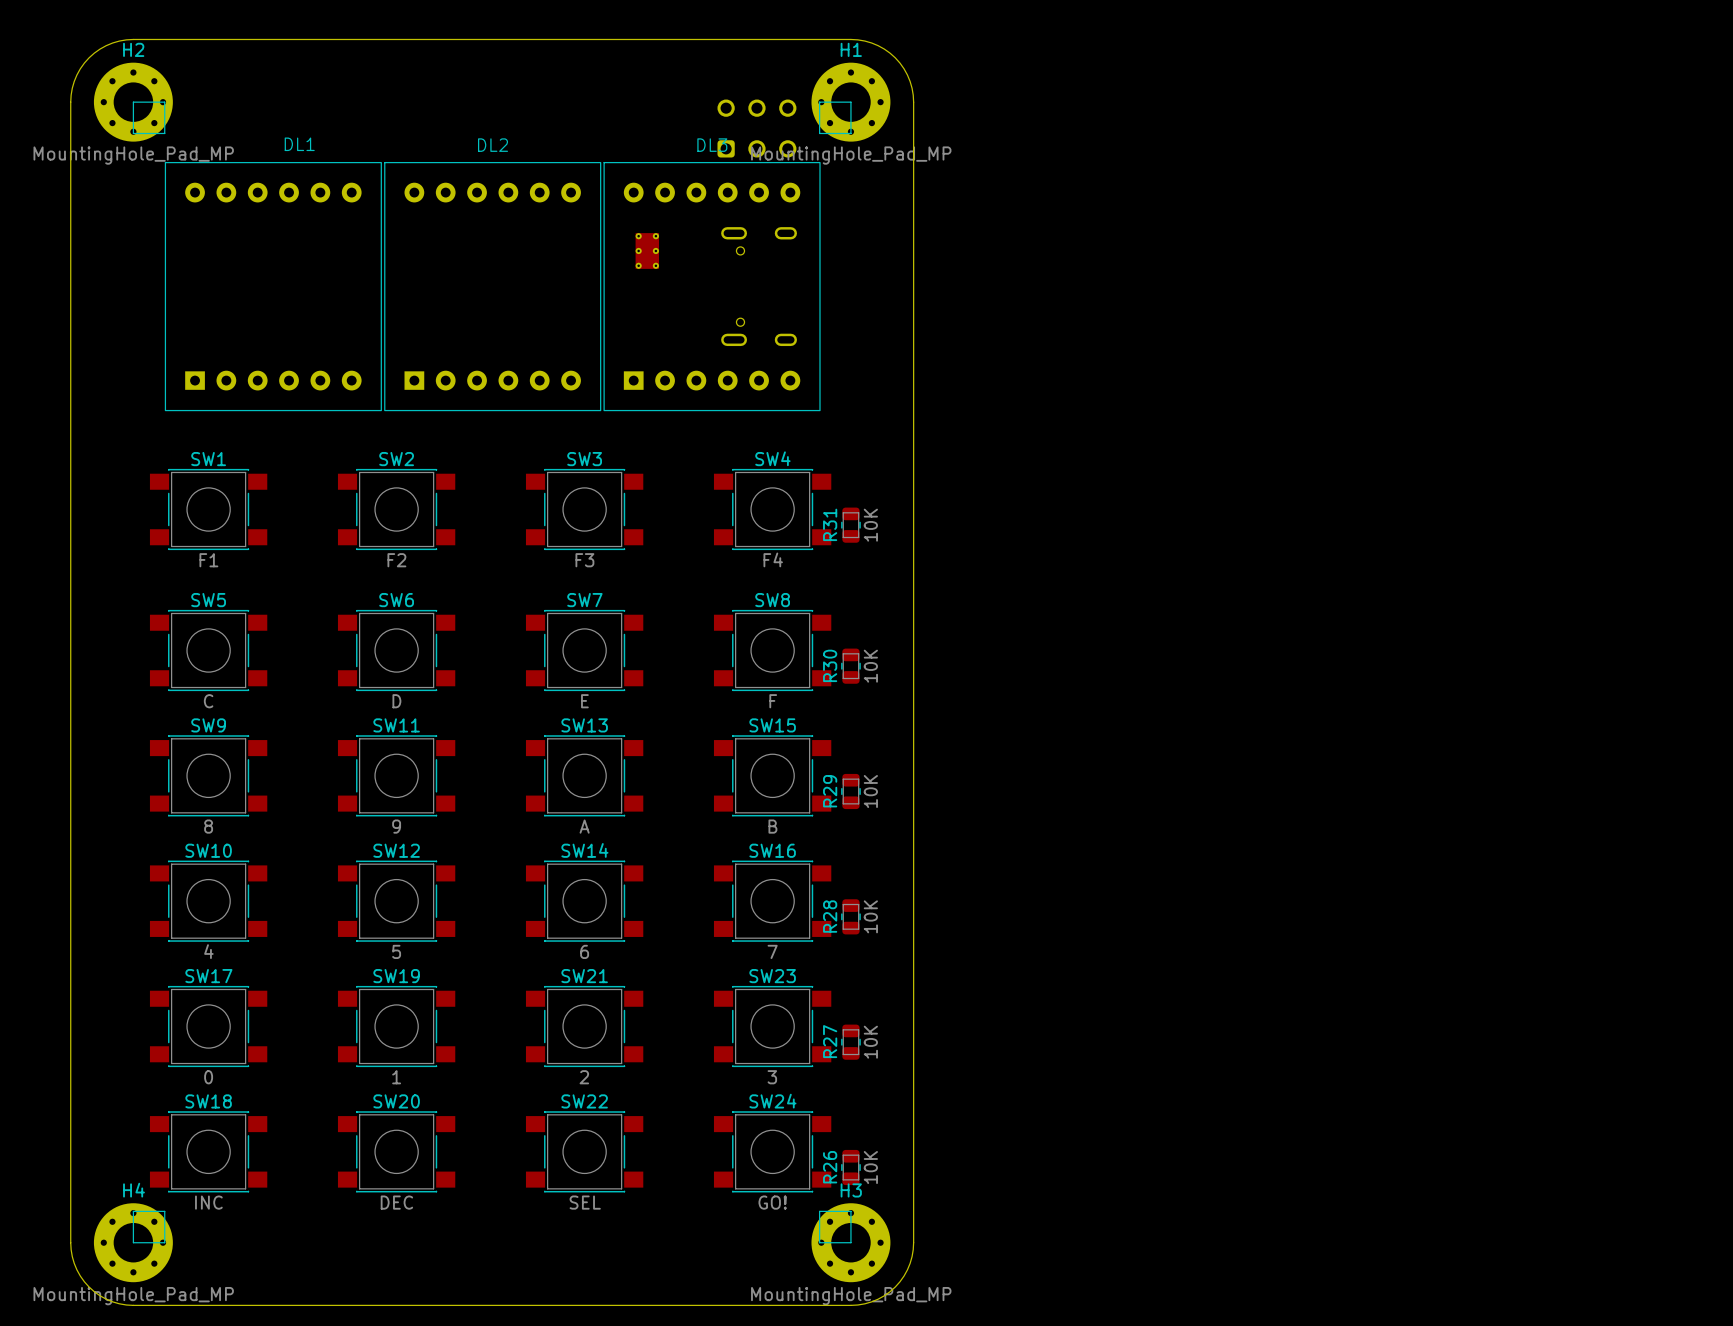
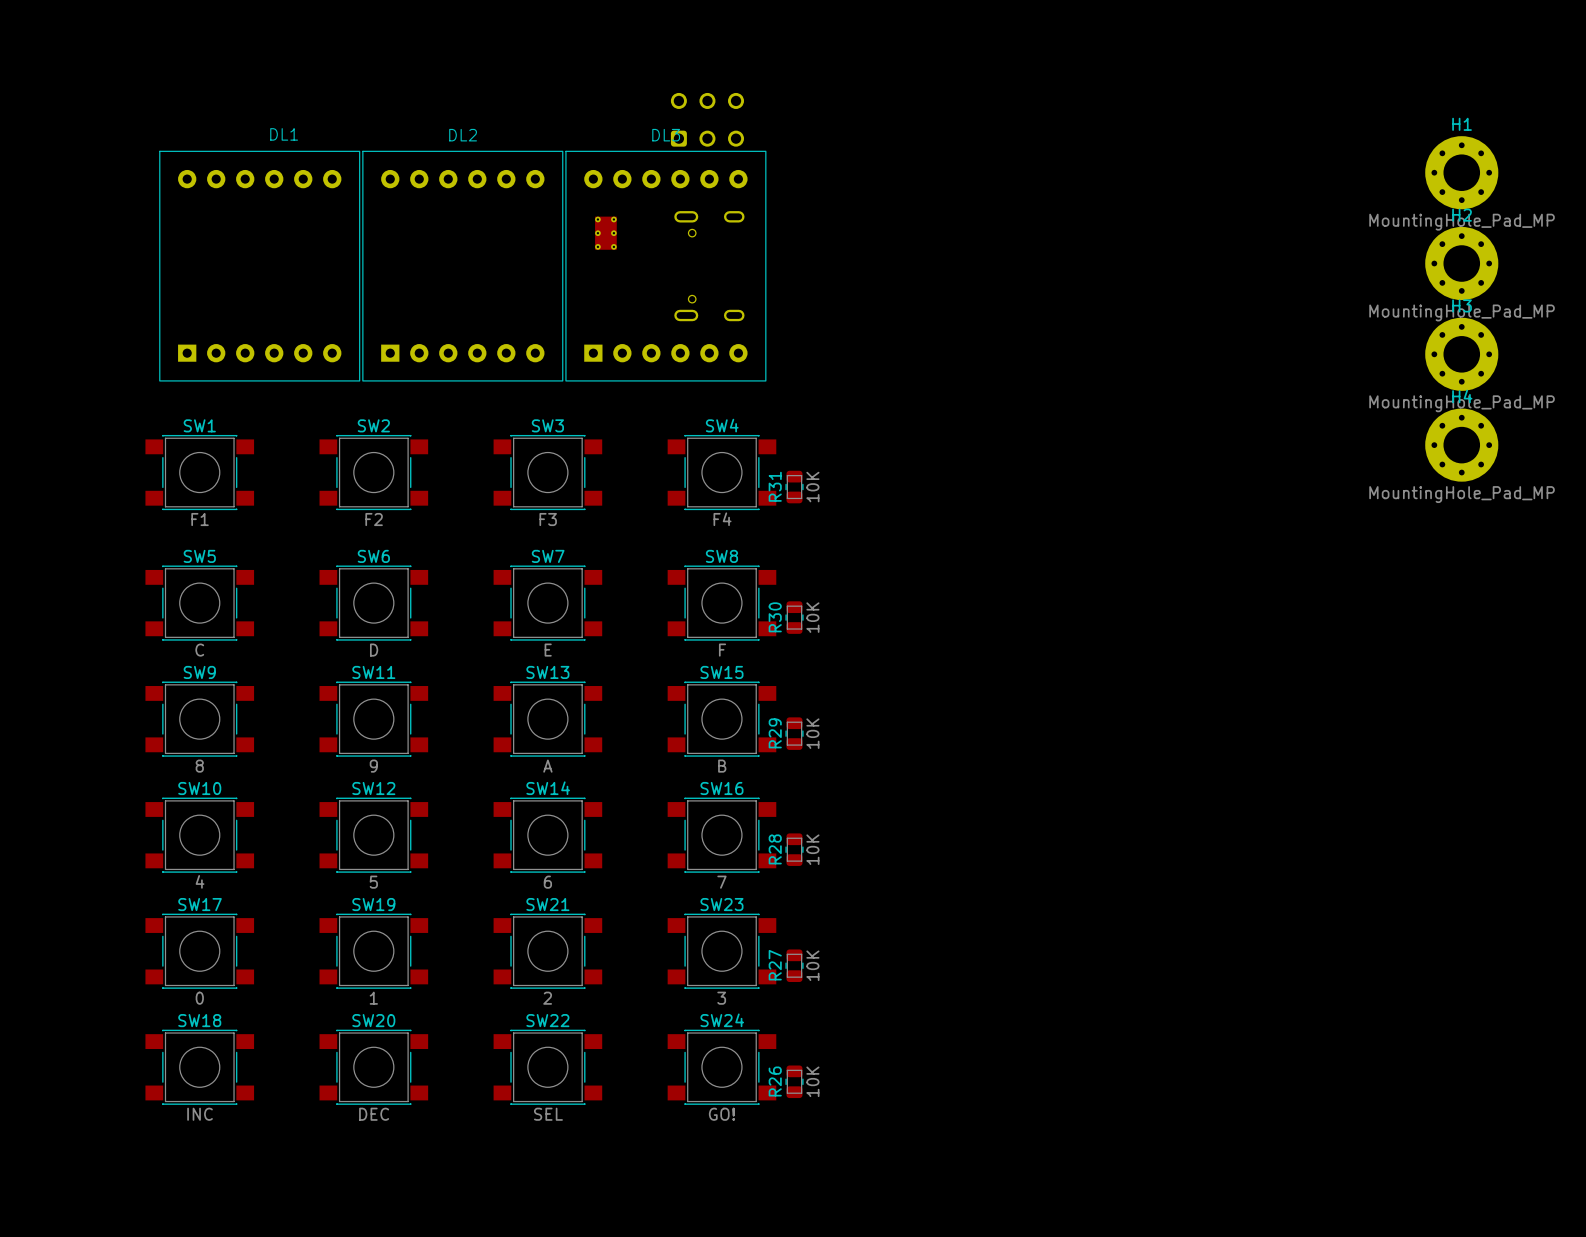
board edge: (133, 39) (850, 39) (864, 41) (884, 49) (895, 57) (904, 68) (910, 81) (913, 102) (913, 1242) (912, 1256) (907, 1269) (895, 1287) (884, 1295) (871, 1301) (850, 1305) (133, 1305) (119, 1303) (106, 1299) (94, 1291) (80, 1276) (72, 1256) (70, 1242) (70, 102) (74, 81) (80, 68) (89, 57) (106, 45) (119, 41) (133, 39) -> none
line: (133, 102) (133, 133) (164, 133) (164, 102) (133, 102) -> none
H2 position: (133, 102) -> (1461, 263)
line: (819, 102) (819, 133) (850, 133) (850, 102) (819, 102) -> none
H1 position: (850, 102) -> (1461, 172)
line: (133, 1211) (164, 1211) (164, 1242) (133, 1242) (133, 1211) -> none
line: (819, 1211) (850, 1211) (850, 1242) (819, 1242) (819, 1211) -> none
H4 position: (133, 1242) -> (1461, 445)
H3 position: (850, 1242) -> (1461, 354)

